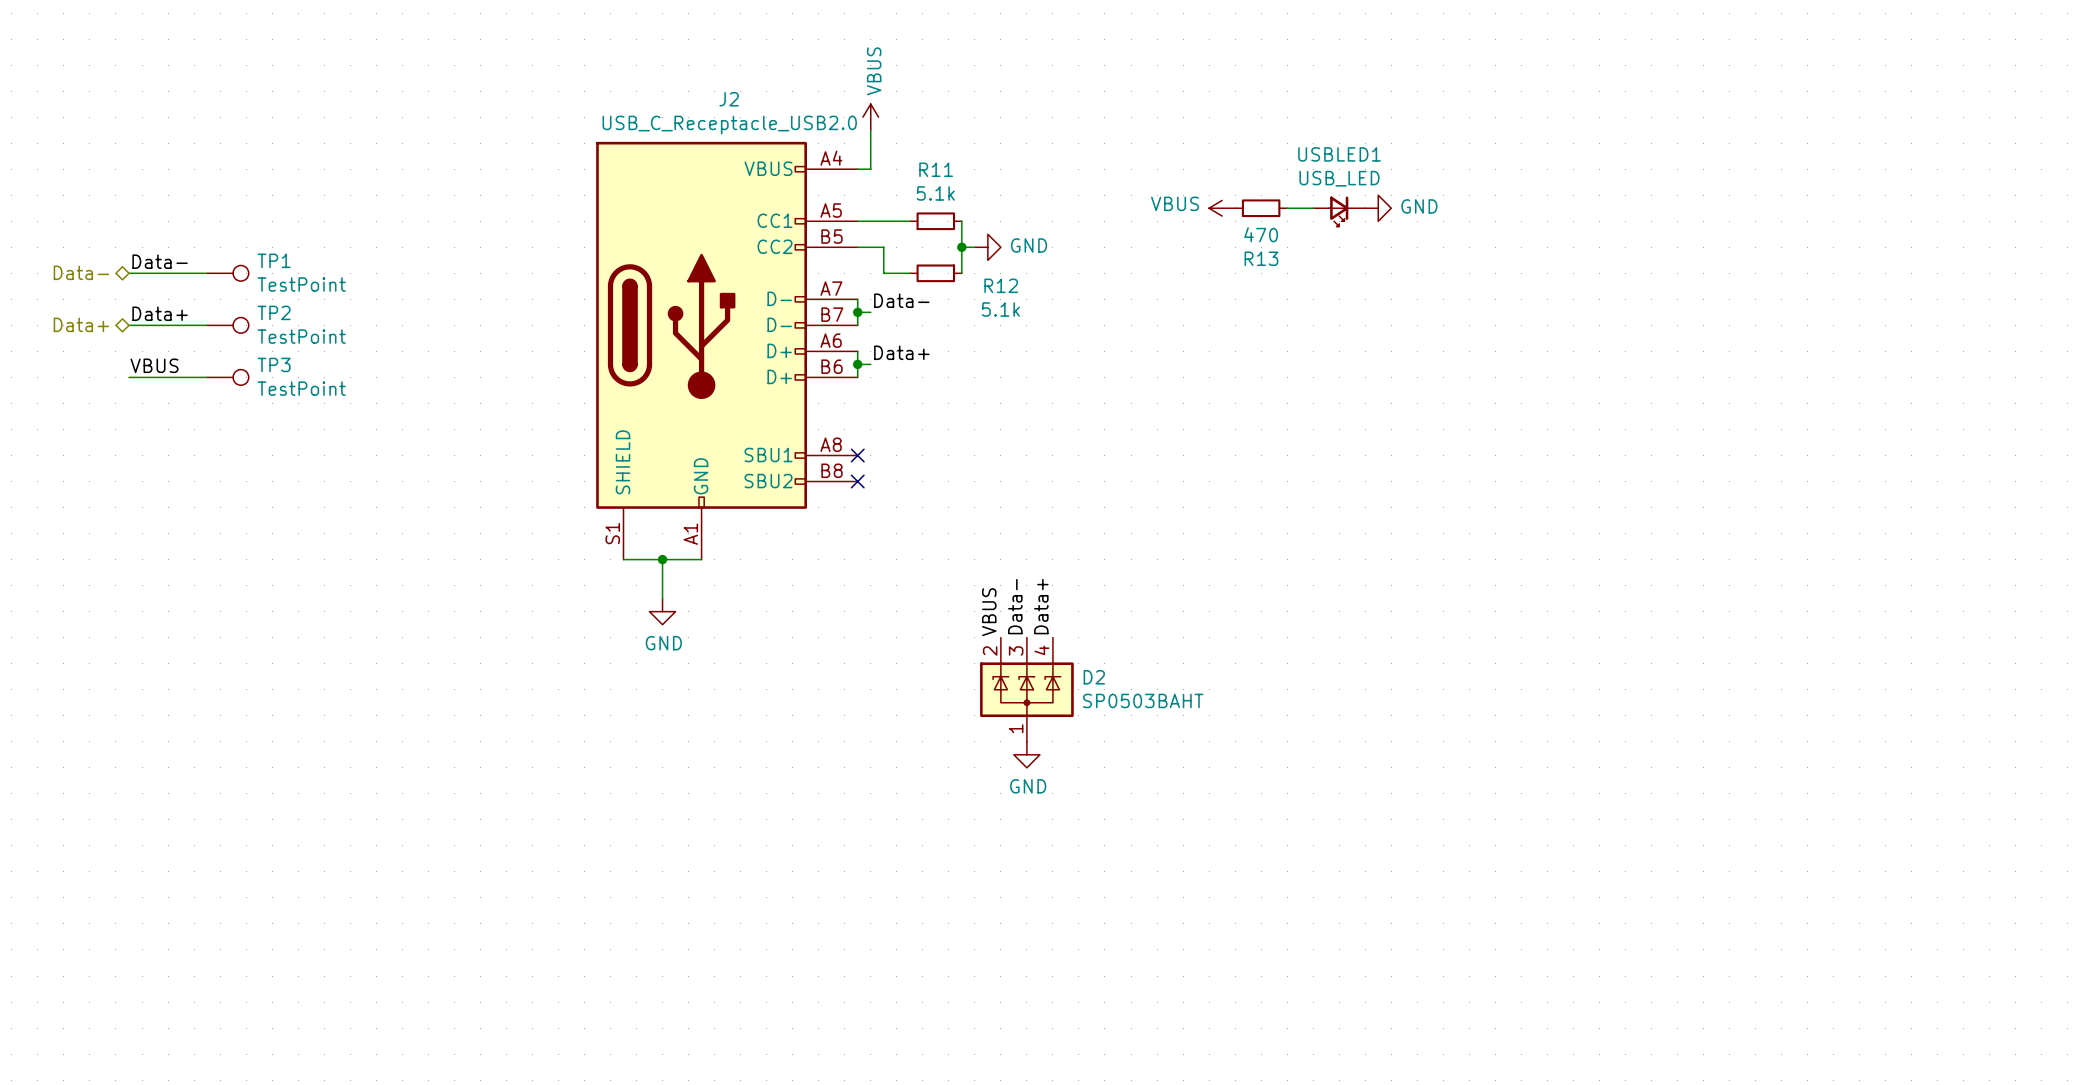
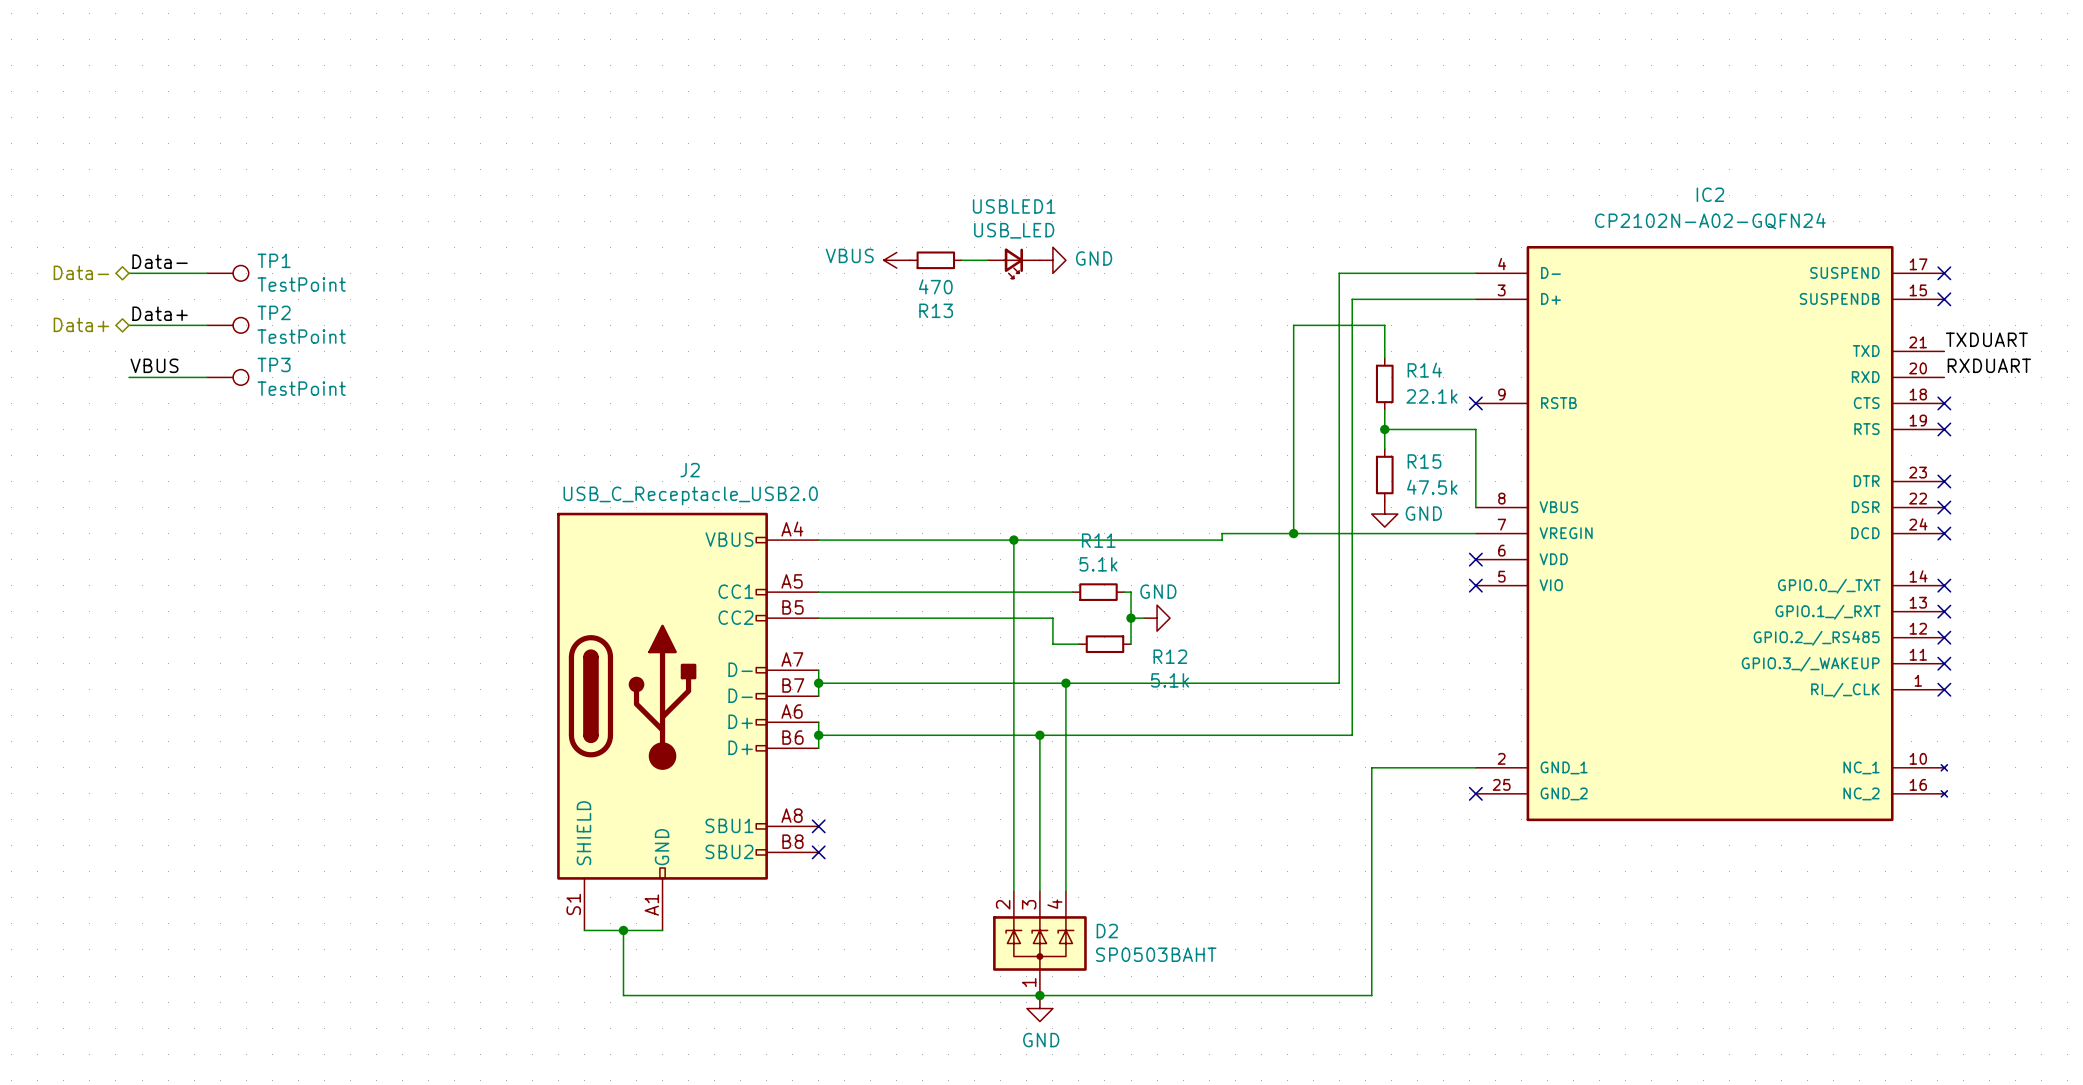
power symbol rotation: 0° (870, 117) -> 90° counterclockwise (896, 260)
power symbol position: VBUS (870, 117) -> VBUS (896, 260)
wire: (870, 130) (870, 169) (857, 169) -> none
power symbol: VBUS (1222, 208) -> none
R13 position: (1261, 208) -> (935, 260)
wire: (1287, 208) (1313, 208) -> none
power symbol: GND (1378, 208) -> none
USBLED1 position: (1339, 211) -> (1013, 263)
wire: (857, 221) (909, 221) -> none
R11 position: (935, 221) -> (1098, 592)
wire: (961, 221) (961, 273) -> none
wire: (857, 247) (883, 247) (883, 273) (909, 273) -> none
wire: (961, 247) (974, 247) -> none
junction: (961, 247) -> none
power symbol position: GND (987, 247) -> GND (1052, 260)
wire: none -> (961, 260) (987, 260)
R12 position: (935, 273) -> (1104, 644)
wire: none -> (1475, 273) (1339, 273) (1339, 683) (818, 683)
no-connect mark: none -> (1944, 273)
wire: (857, 299) (857, 325) -> none
wire: none -> (1475, 299) (1352, 299) (1352, 735) (818, 735)
no-connect mark: none -> (1944, 299)
label: Data- (901, 300) -> none
wire: (857, 312) (870, 312) -> none
junction: (857, 312) -> none
label: none -> TXDUART (1986, 339)
J2 position: (726, 350) -> (687, 721)
wire: (857, 351) (857, 377) -> none
label: Data+ (901, 352) -> none
wire: none -> (1384, 357) (1384, 325) (1293, 325) (1293, 533)
wire: (857, 364) (870, 364) -> none
junction: (857, 364) -> none
label: none -> RXDUART (1989, 365)
R14: none -> 22.1k (1384, 383)
no-connect mark: none -> (1475, 403)
no-connect mark: none -> (1944, 403)
wire: none -> (1384, 409) (1384, 448)
wire: none -> (1384, 429) (1475, 429) (1475, 507)
junction: none -> (1384, 429)
no-connect mark: none -> (1944, 429)
no-connect mark: (857, 455) -> none
R15: none -> 47.5k (1384, 475)
no-connect mark: (857, 481) -> none
no-connect mark: none -> (1944, 481)
no-connect mark: none -> (1944, 507)
power symbol: none -> GND (1384, 514)
junction: none -> (1293, 533)
wire: none -> (1475, 533) (1222, 533) (1222, 540) (818, 540)
IC2: none -> CP2102N-A02-GQFN24 (1711, 533)
no-connect mark: none -> (1944, 533)
wire: none -> (1013, 540) (1013, 891)
junction: none -> (1013, 540)
junction: (662, 559) -> none
no-connect mark: none -> (1475, 559)
no-connect mark: none -> (1475, 585)
no-connect mark: none -> (1944, 585)
wire: none -> (818, 592) (1072, 592)
wire: none -> (1124, 592) (1131, 592) (1131, 644)
label: Data- (1015, 606) -> none
label: Data+ (1041, 606) -> none
power symbol: GND (662, 611) -> none
no-connect mark: none -> (1944, 611)
label: VBUS (989, 612) -> none
wire: none -> (818, 618) (1052, 618) (1052, 644) (1078, 644)
wire: none -> (1131, 618) (1144, 618)
junction: none -> (1131, 618)
power symbol: none -> GND (1157, 618)
no-connect mark: none -> (1944, 637)
no-connect mark: none -> (1944, 663)
wire: none -> (818, 670) (818, 696)
junction: none -> (818, 683)
wire: none -> (1065, 683) (1065, 891)
junction: none -> (1065, 683)
D2 position: (1026, 689) -> (1039, 943)
no-connect mark: none -> (1944, 689)
wire: none -> (818, 722) (818, 748)
junction: none -> (818, 735)
wire: none -> (1039, 735) (1039, 891)
junction: none -> (1039, 735)
power symbol: GND (1026, 754) -> none
wire: none -> (1475, 767) (1371, 767) (1371, 995) (623, 995) (623, 930)
no-connect mark: none -> (1475, 793)
no-connect mark: none -> (818, 826)
no-connect mark: none -> (818, 852)
wire: none -> (584, 930) (662, 930)
junction: none -> (623, 930)
junction: none -> (1039, 995)
power symbol: none -> GND (1039, 1008)

